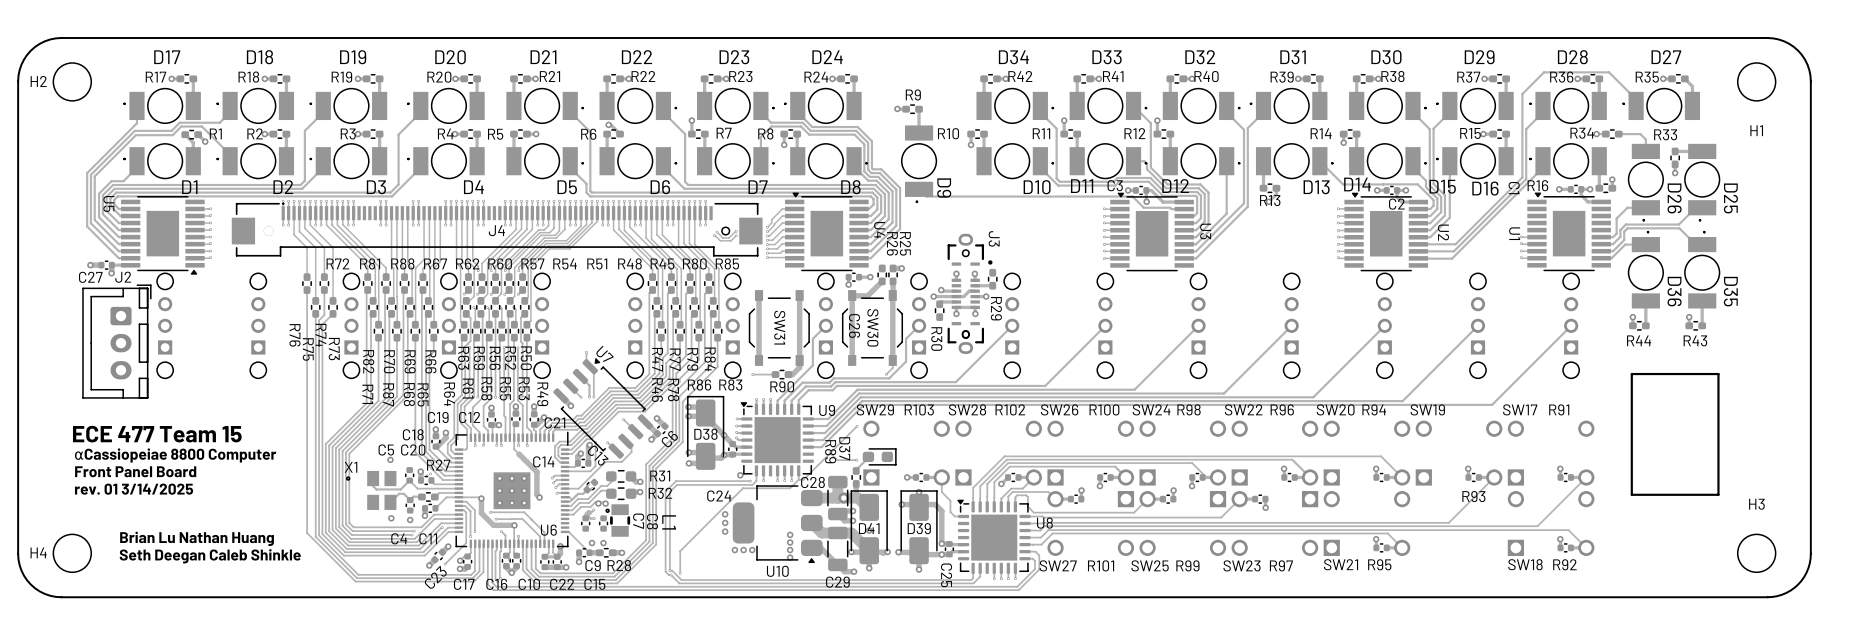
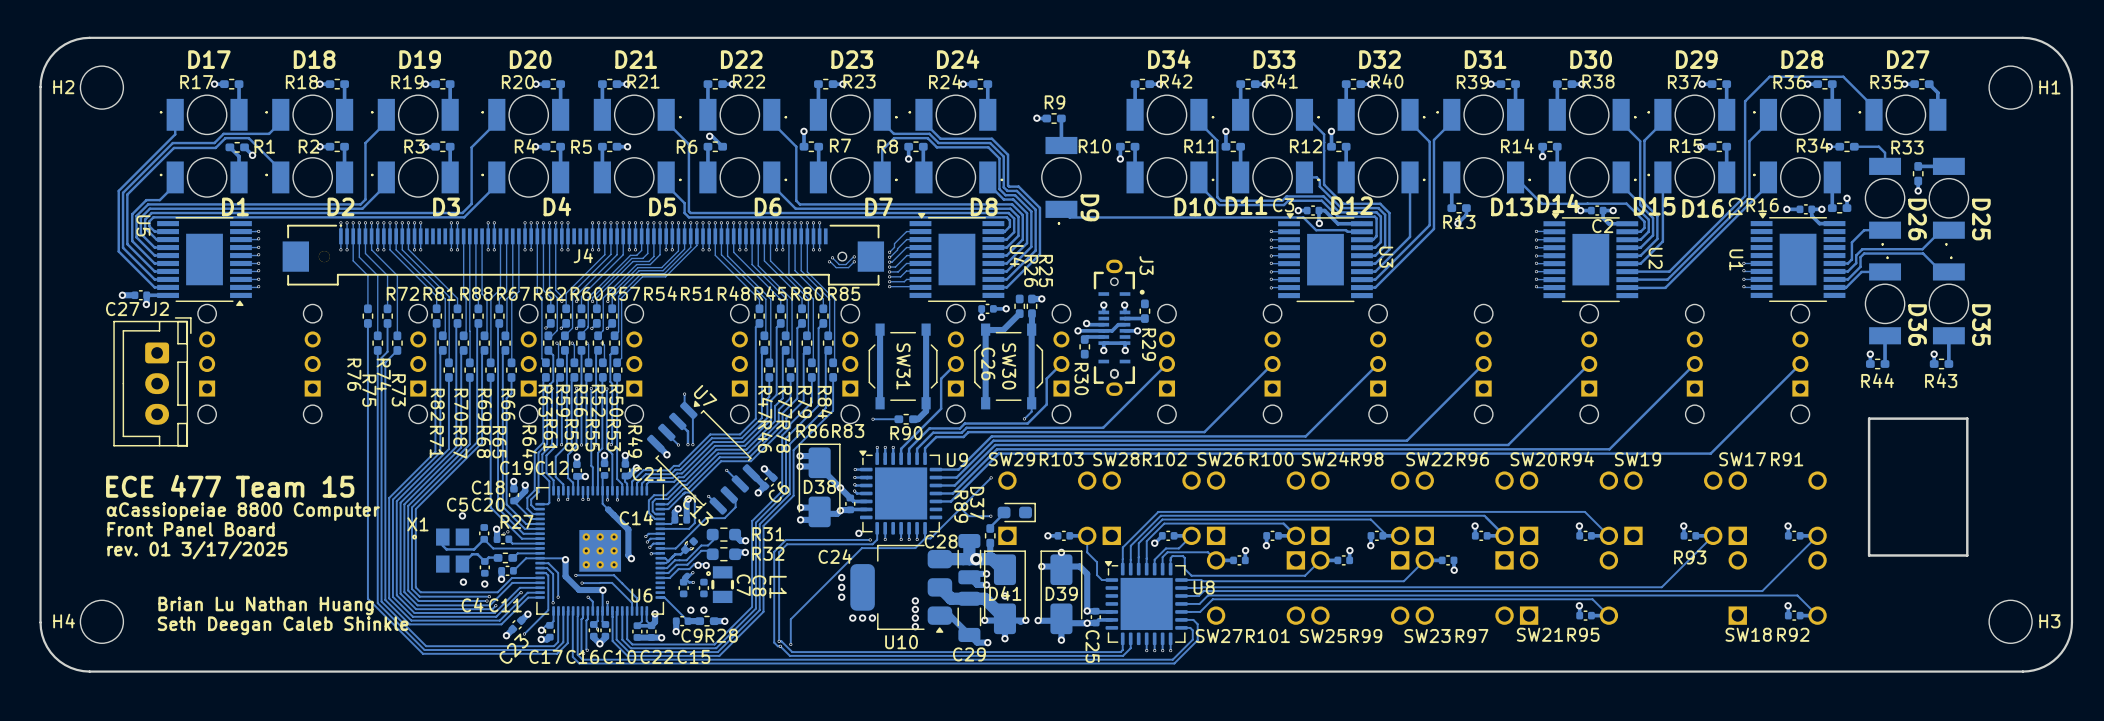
H1 name position: H1 (1756, 130) -> H1 (2049, 87)
text: rev. 01 3/14/2025 (134, 489) -> rev. 01 3/17/2025 (197, 550)
H3 name position: H3 (1756, 504) -> H3 (2049, 621)

